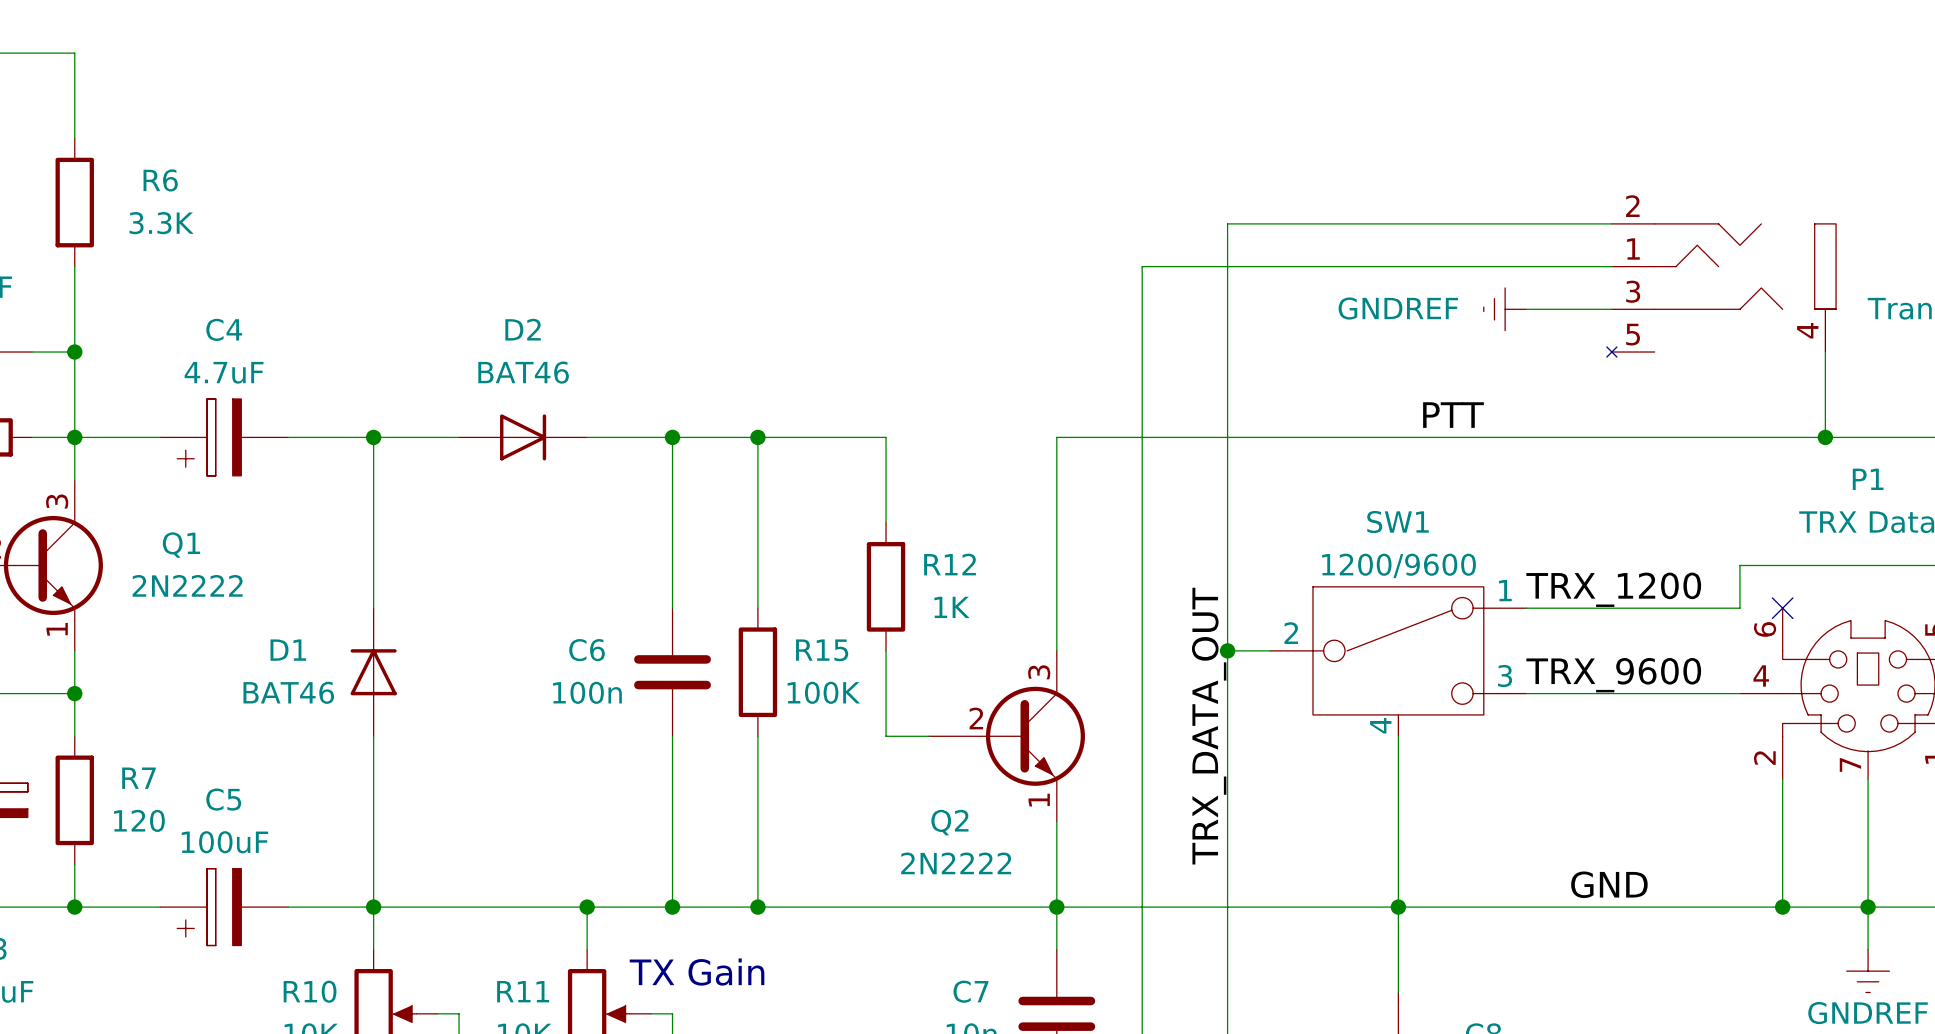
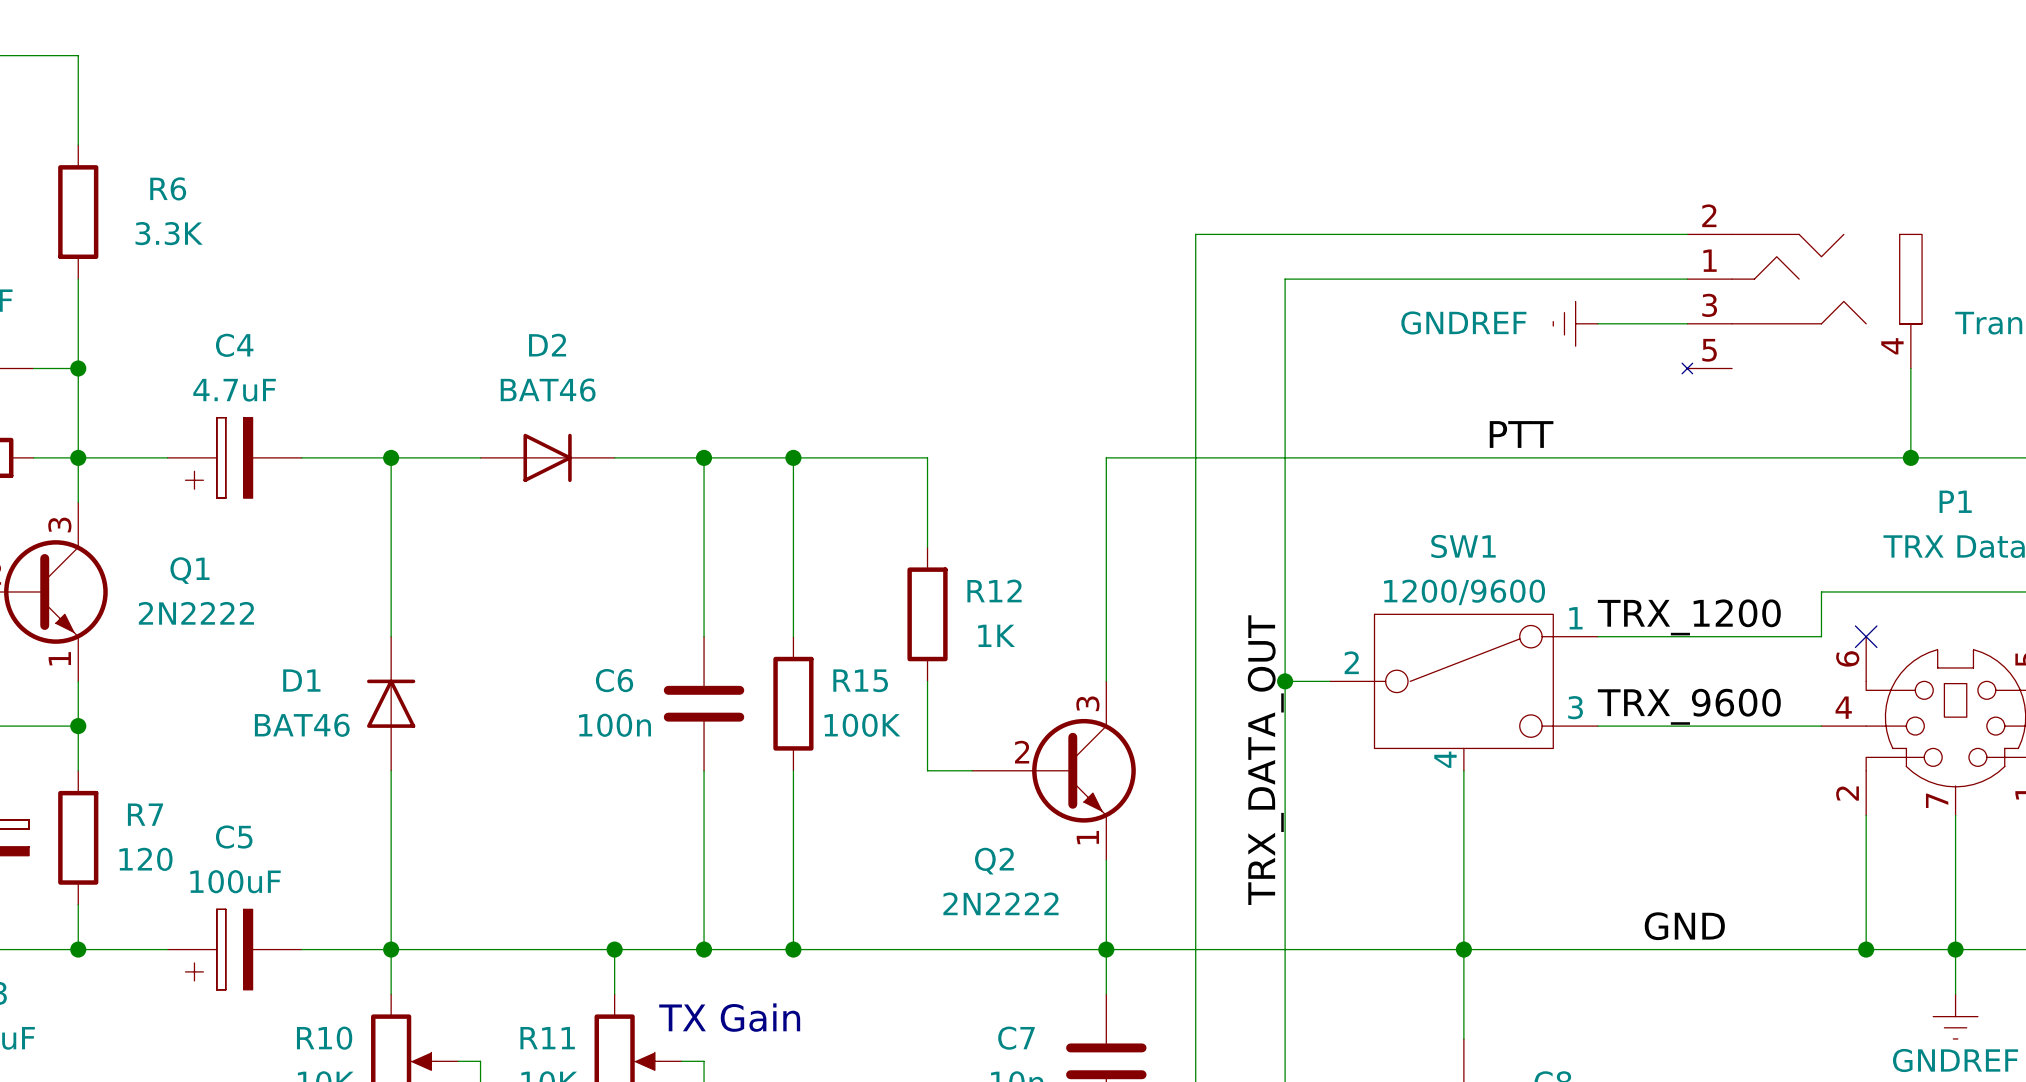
wire: (1227, 223) (1227, 266) (1142, 266) -> (1285, 234) (1195, 234) (1195, 279)

